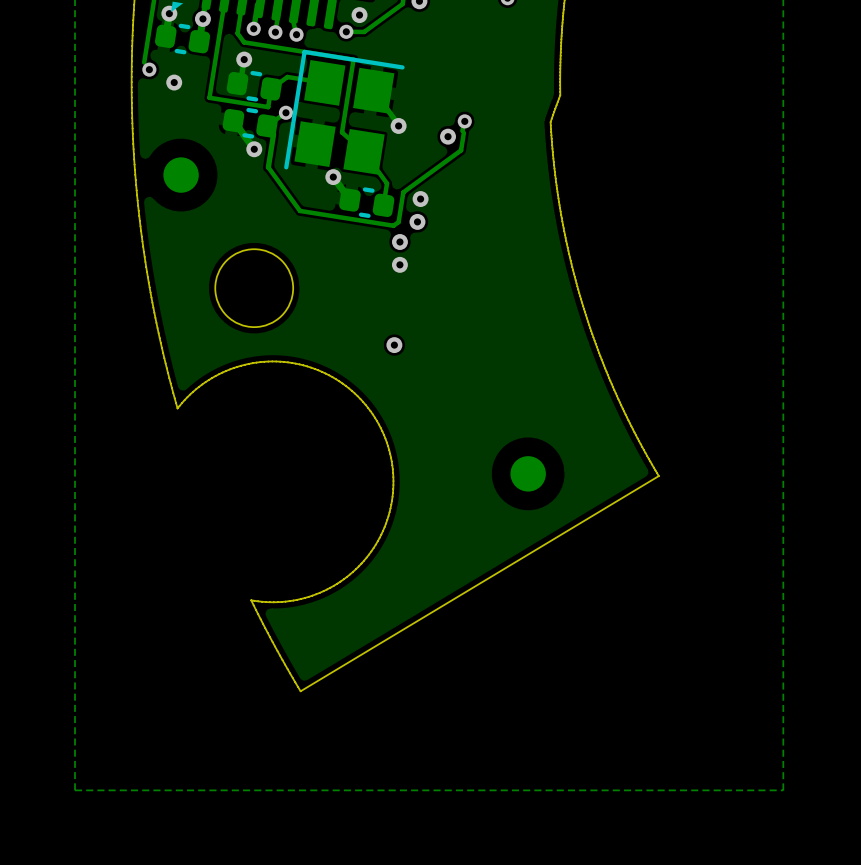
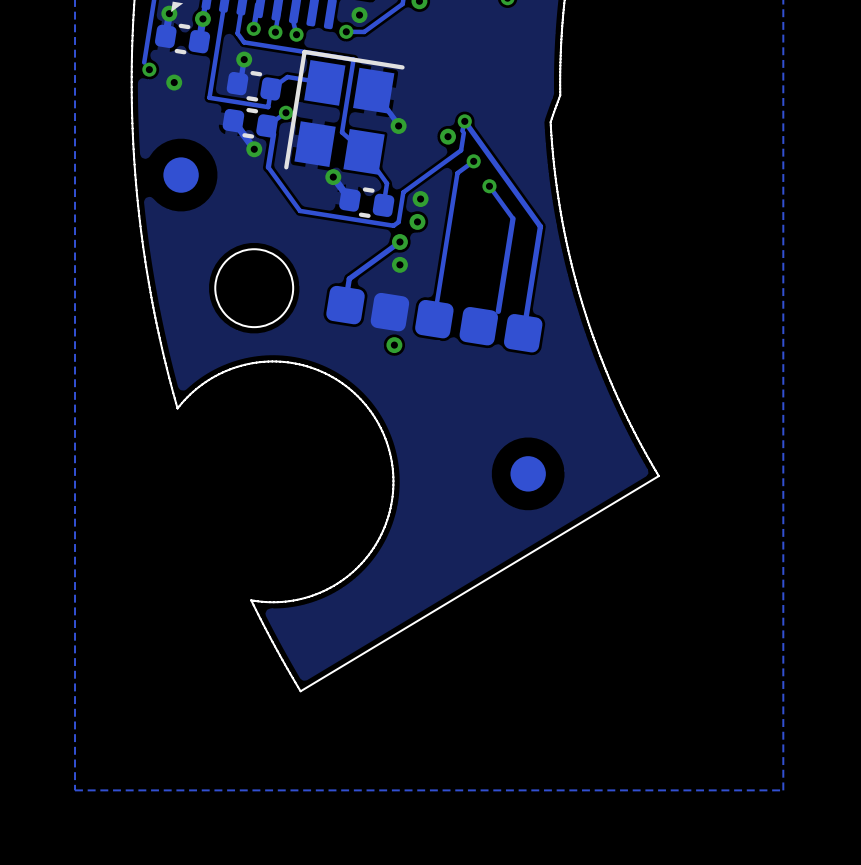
track: none -> (464, 121) (540, 226) (523, 333)
track: none -> (473, 161) (457, 173) (434, 319)
via: none -> (473, 161)
track: none -> (489, 186) (513, 218) (498, 311)
via: none -> (489, 186)
track: none -> (399, 242) (349, 278) (345, 305)
part: none -> (434, 319)

